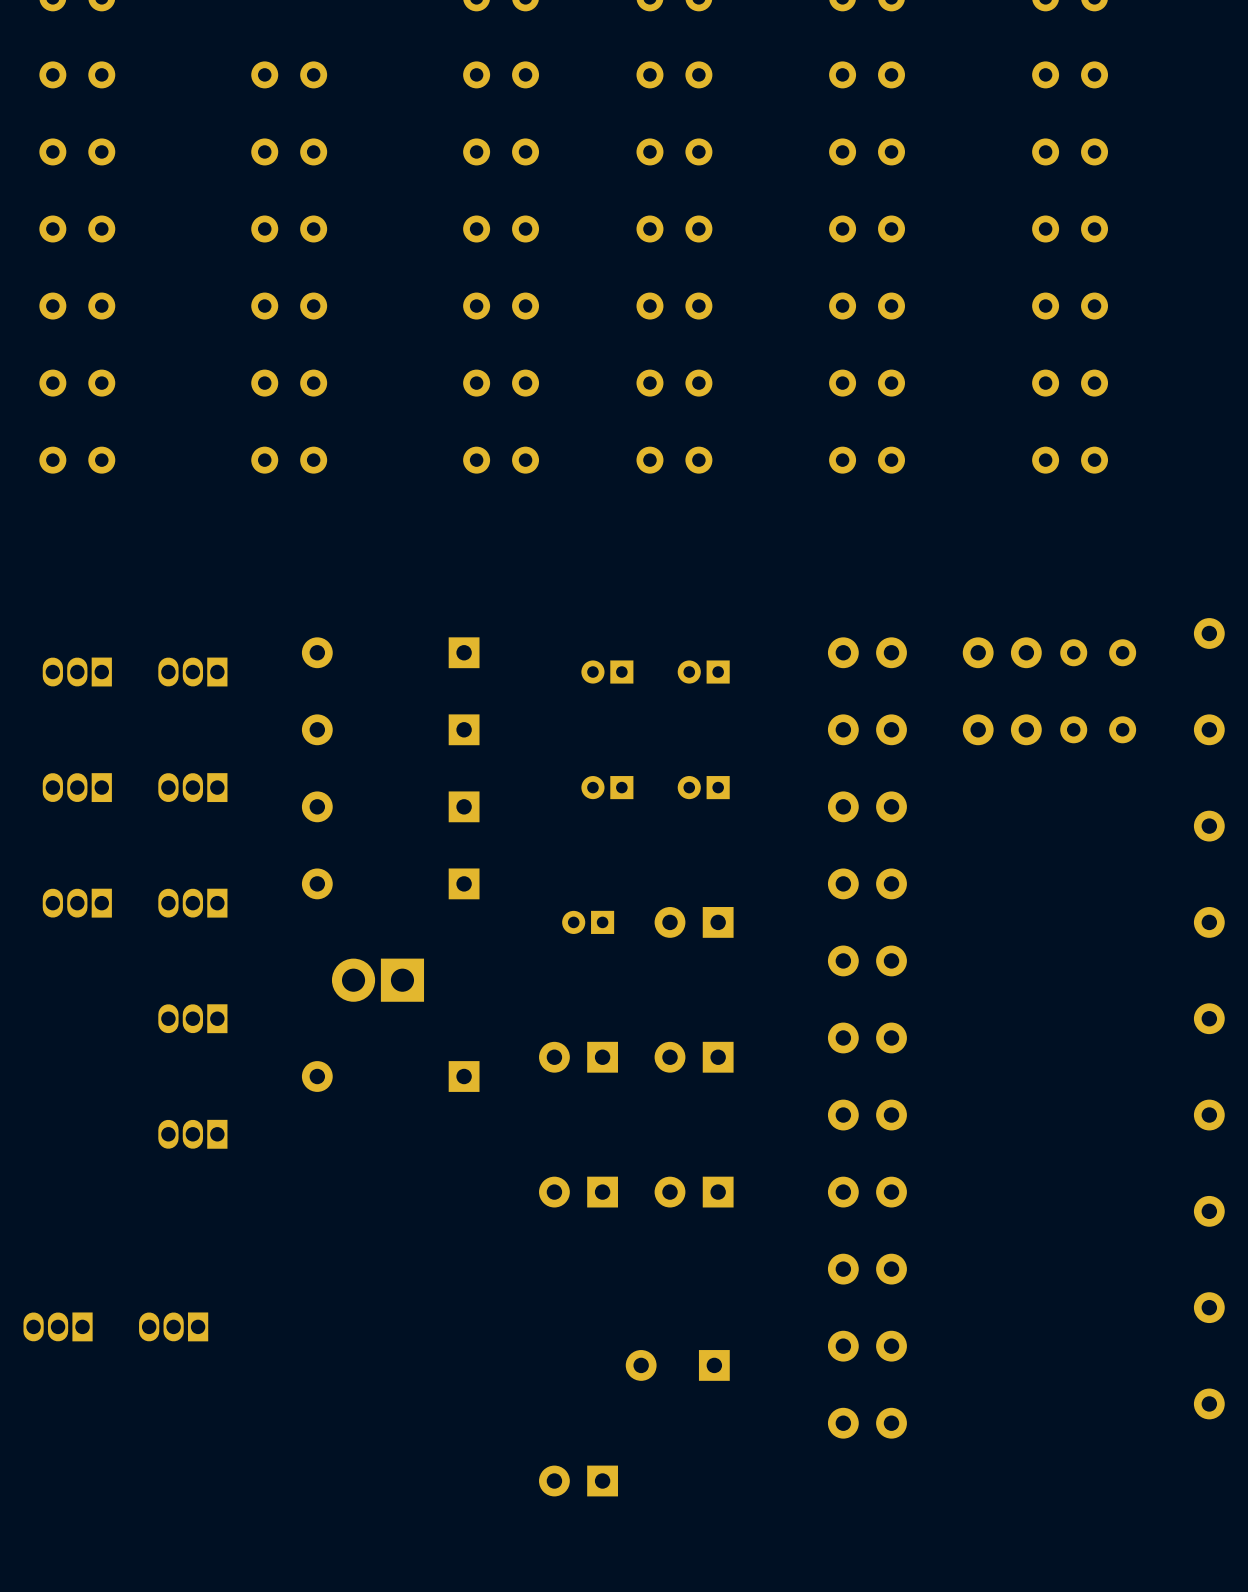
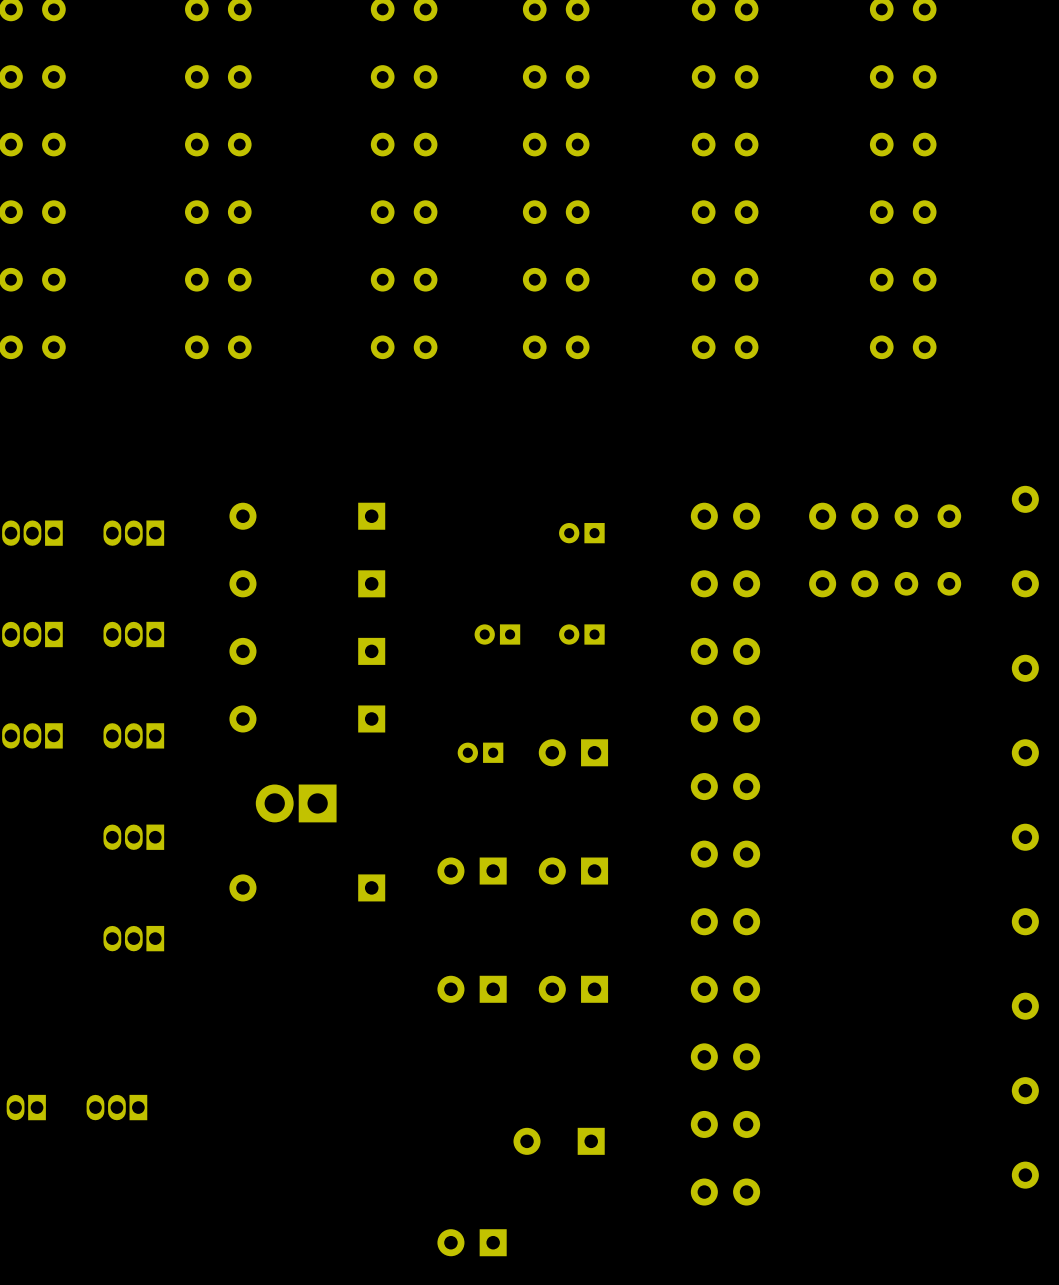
part: (607, 672) -> none

